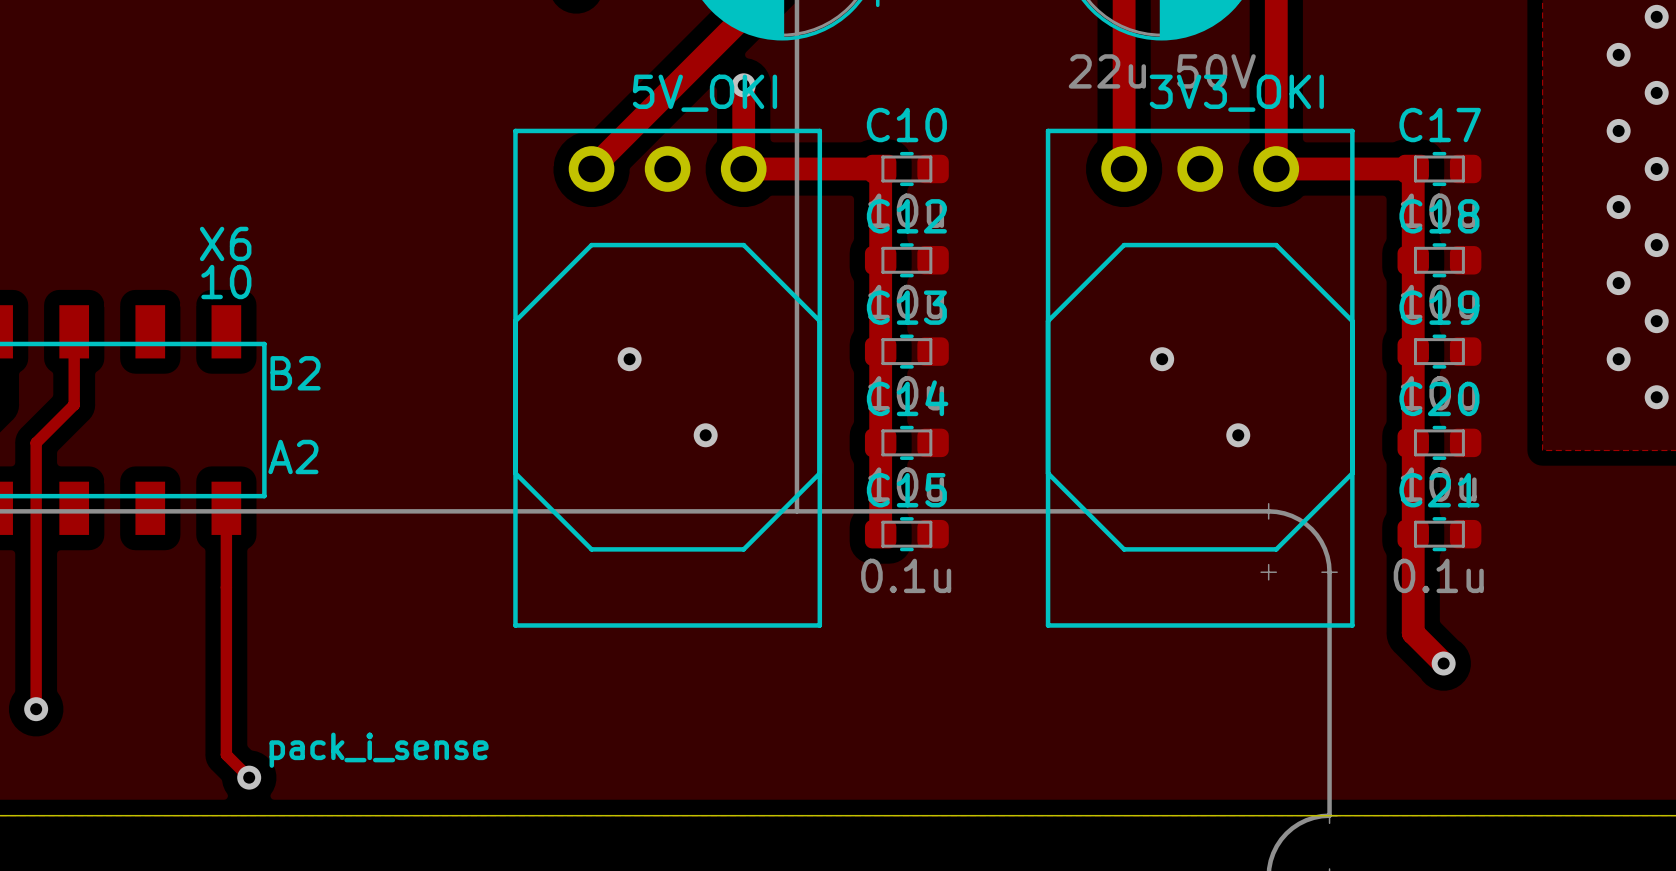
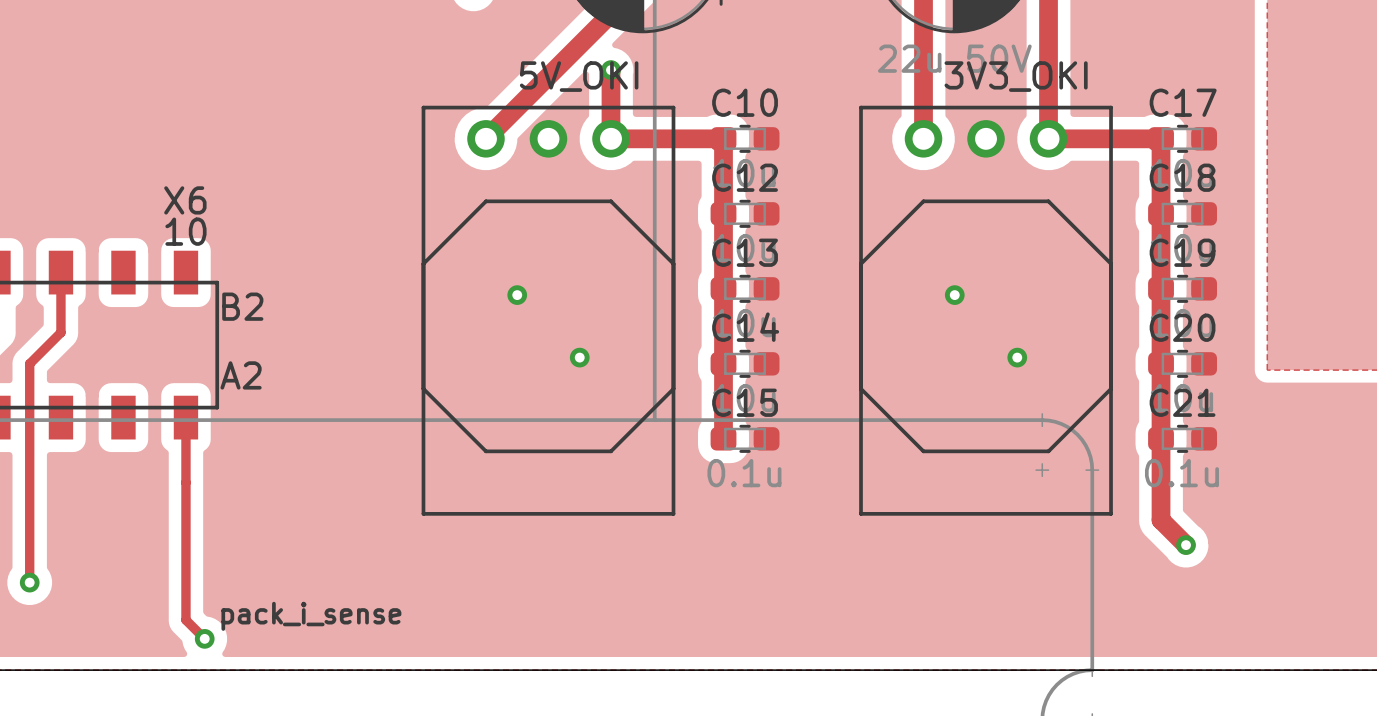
via: (1656, 16) -> none
via: (1618, 54) -> none
via: (1656, 92) -> none
via: (1618, 130) -> none
via: (1656, 168) -> none
via: (1618, 207) -> none
via: (1656, 245) -> none
via: (1618, 283) -> none
via: (1656, 321) -> none
via: (1618, 359) -> none
via: (1656, 397) -> none

